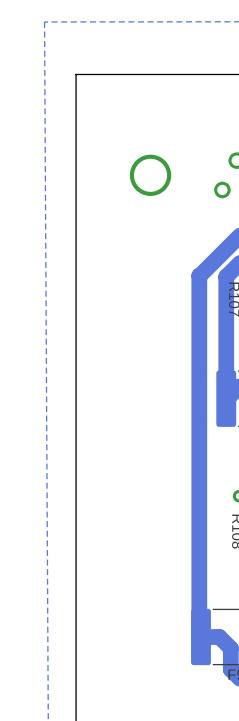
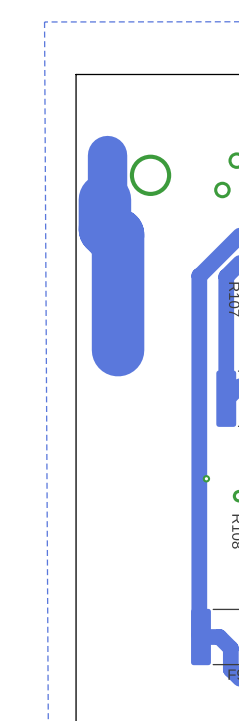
track: none -> (107, 155) (107, 192)
track: none -> (104, 199) (104, 229) (110, 234) (118, 234) (118, 350)
via: none -> (206, 478)

